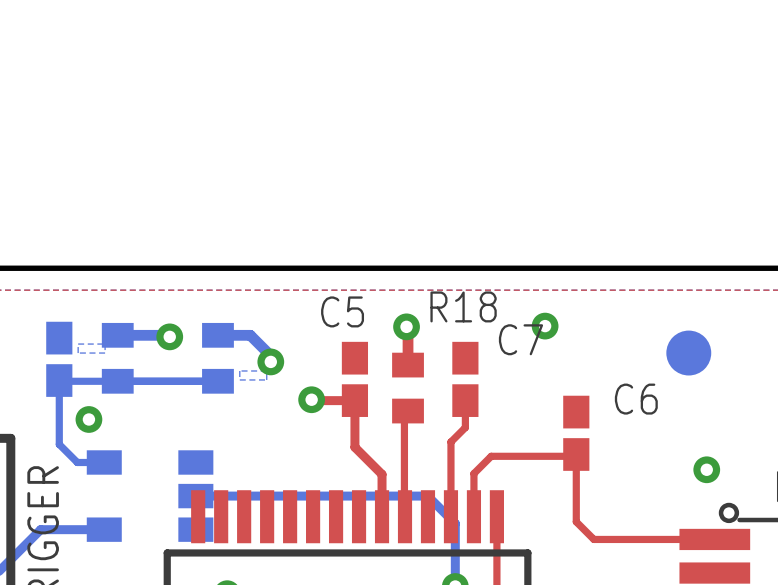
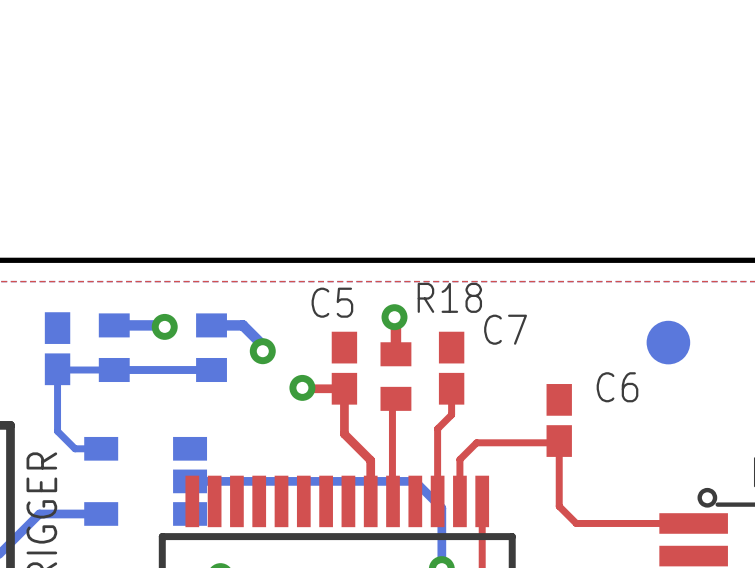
via: (545, 326) -> none
bottom zone outline: (78, 344) (105, 344) (105, 353) (78, 353) (78, 344) -> none
bottom zone outline: (239, 370) (266, 370) (266, 379) (239, 379) (239, 370) -> none
via: (88, 419) -> none
via: (706, 469) -> none

